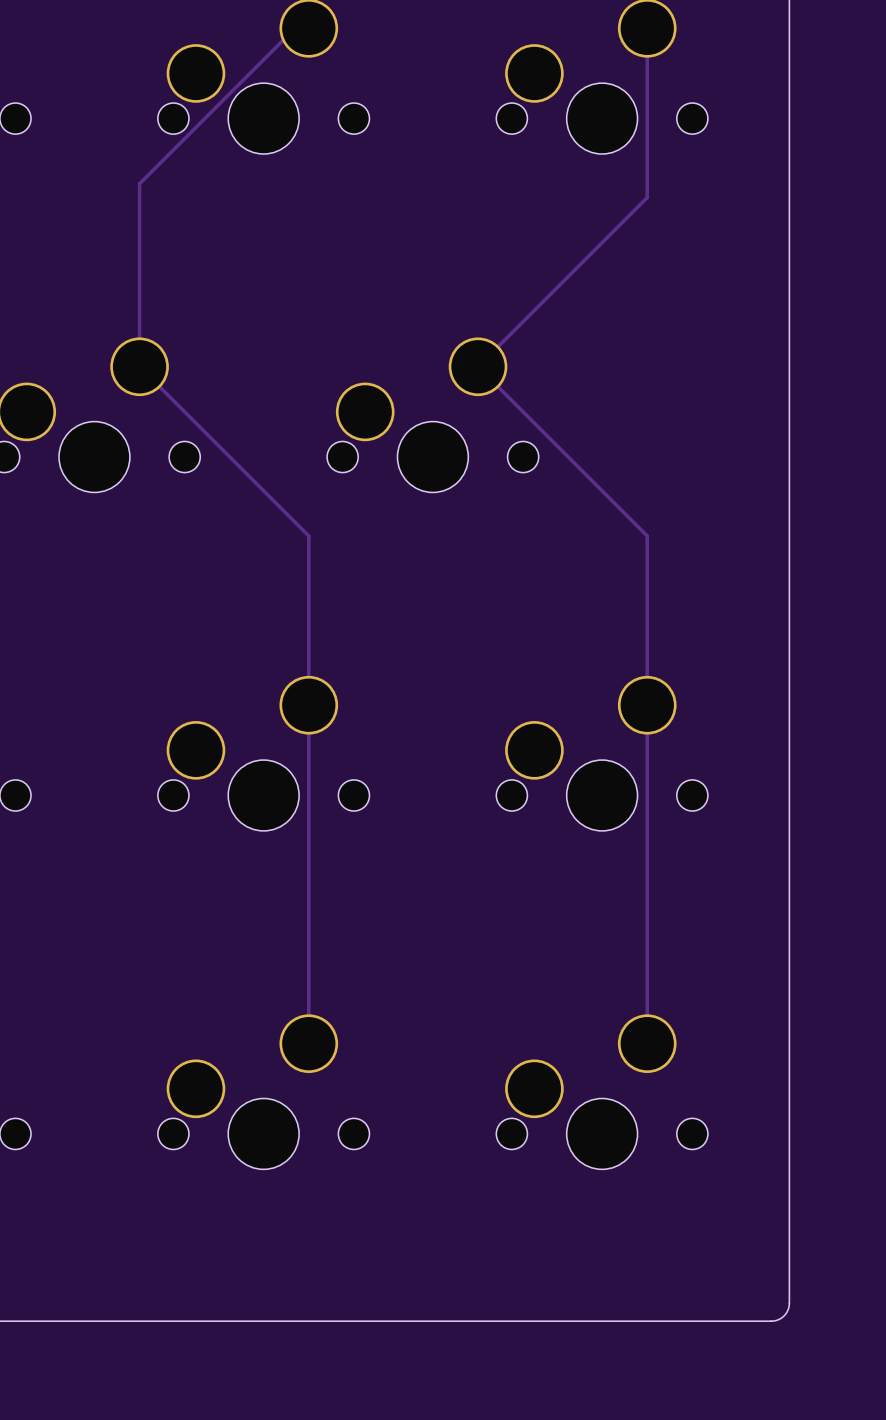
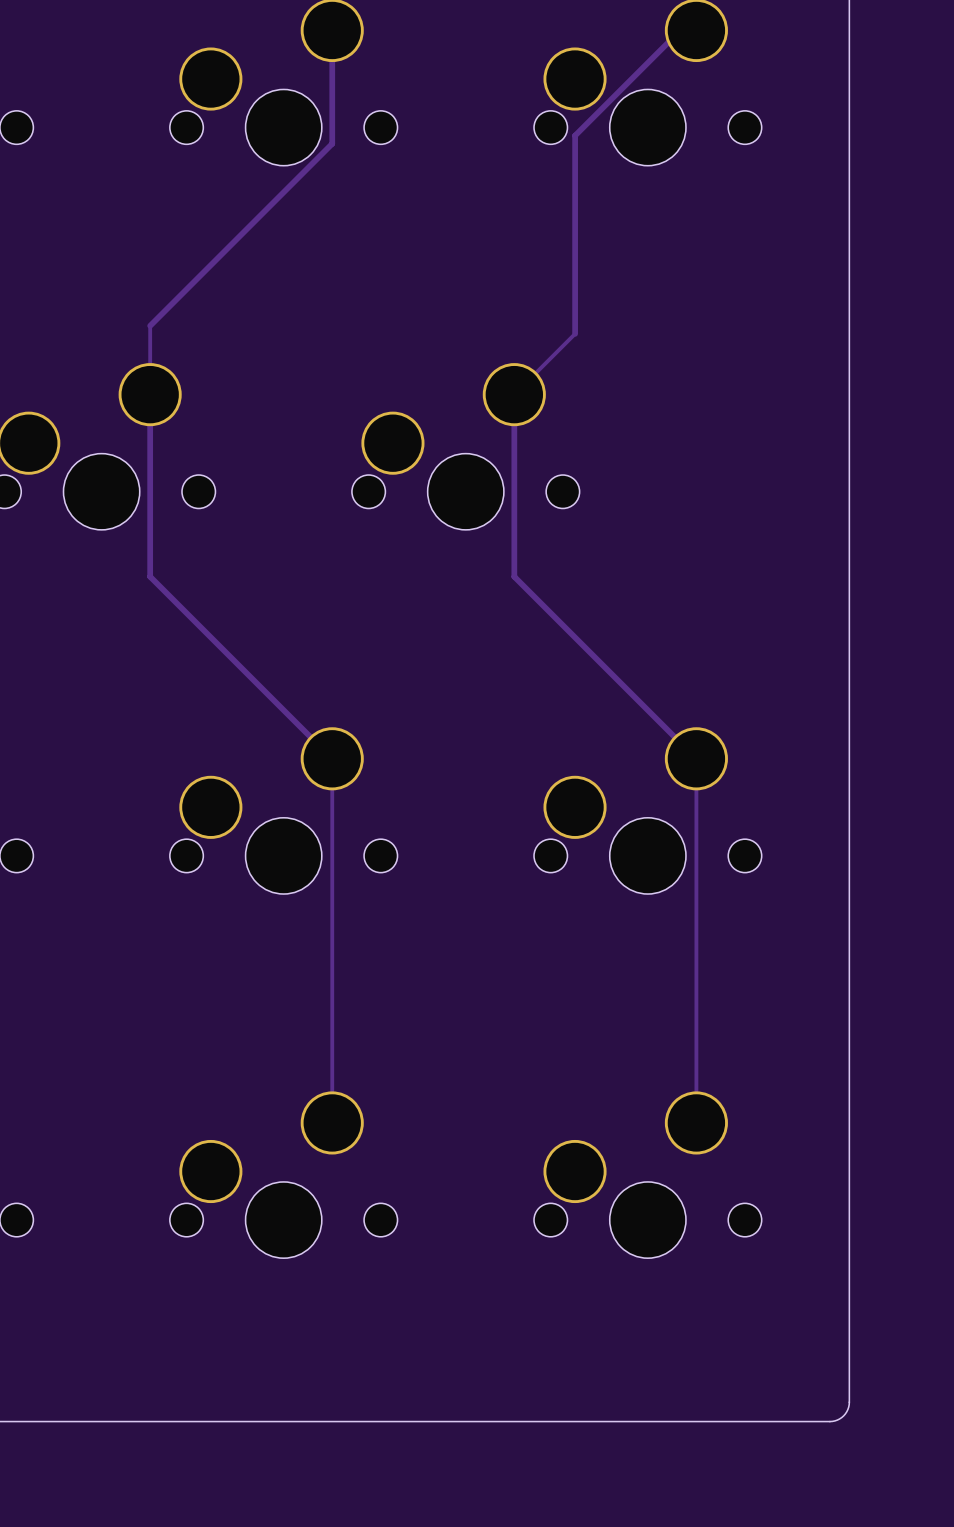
track: (308, 28) (295, 28) (139, 183) (139, 302) -> (332, 30) (332, 143) (150, 325)
track: (647, 28) (647, 197) (534, 310) -> (696, 30) (680, 30) (575, 135) (575, 333)
track: (139, 366) (308, 536) (308, 705) -> (150, 394) (150, 576) (332, 758)
track: (478, 366) (647, 536) (647, 705) -> (514, 394) (514, 576) (696, 758)

